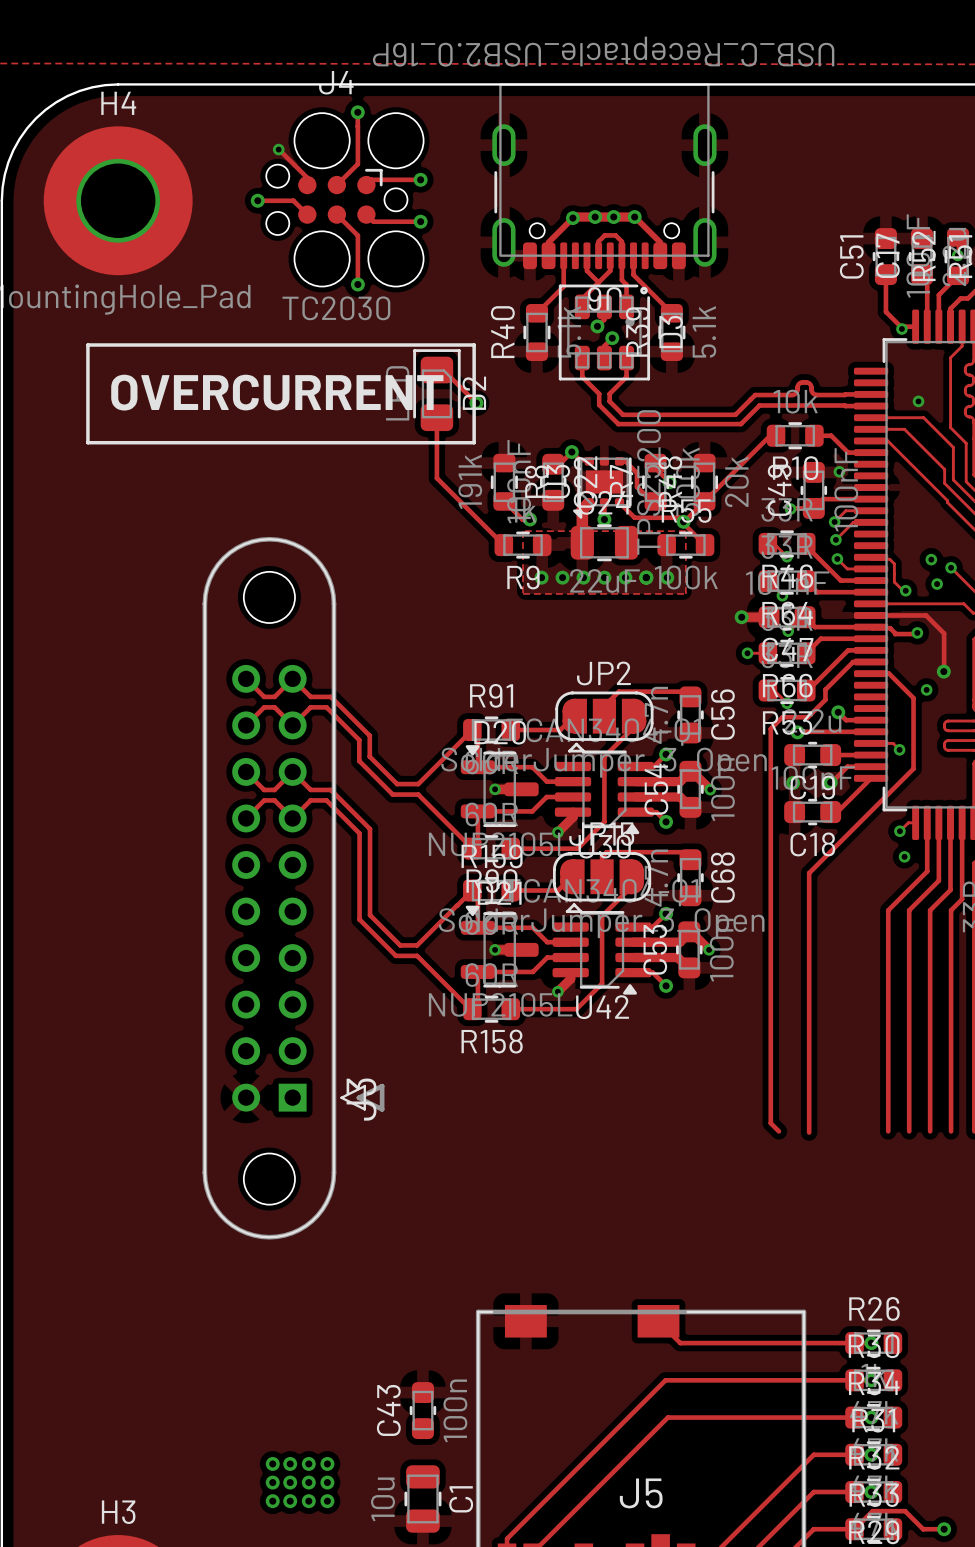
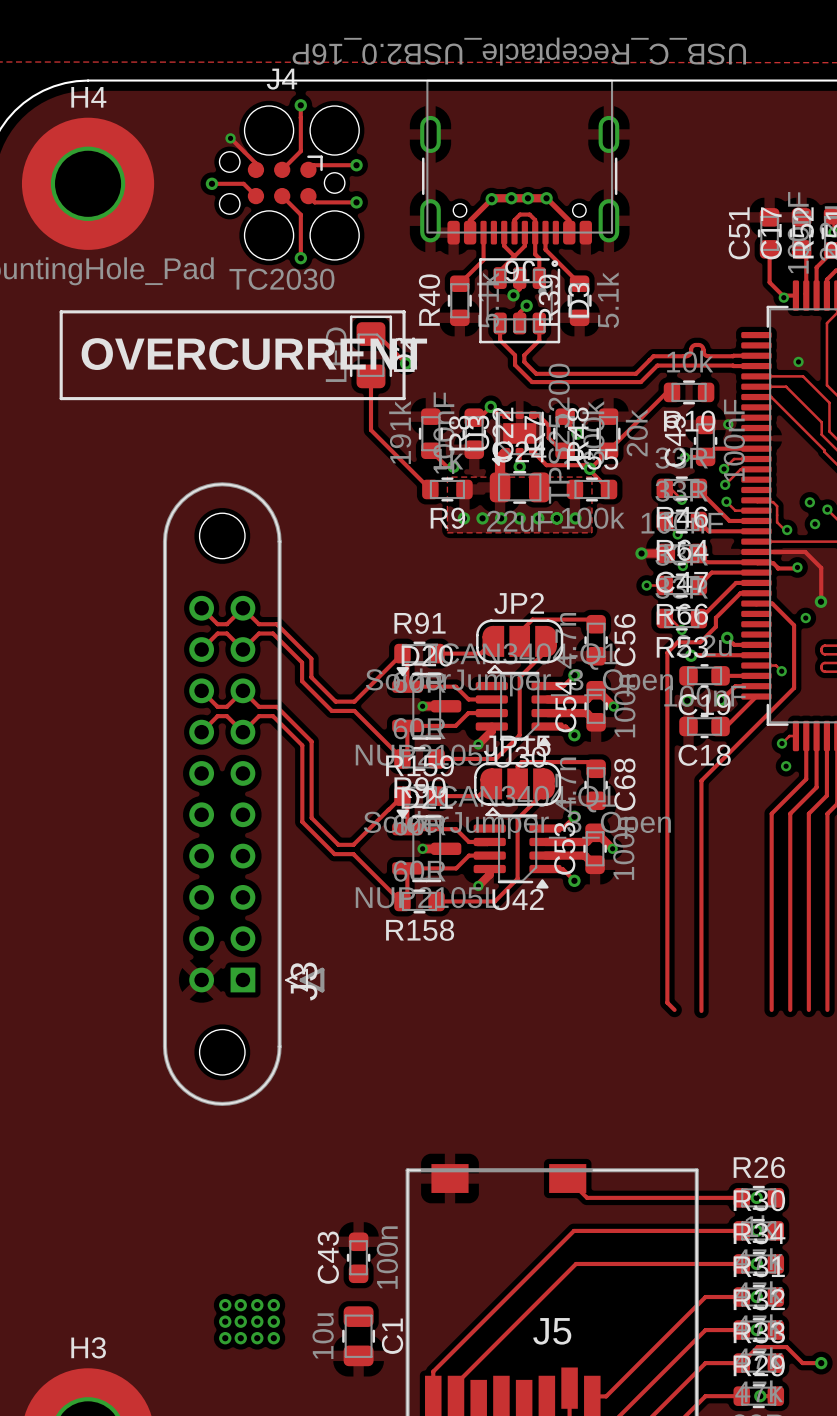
track: (814, 435) (831, 435) (848, 452) (871, 452) -> none

